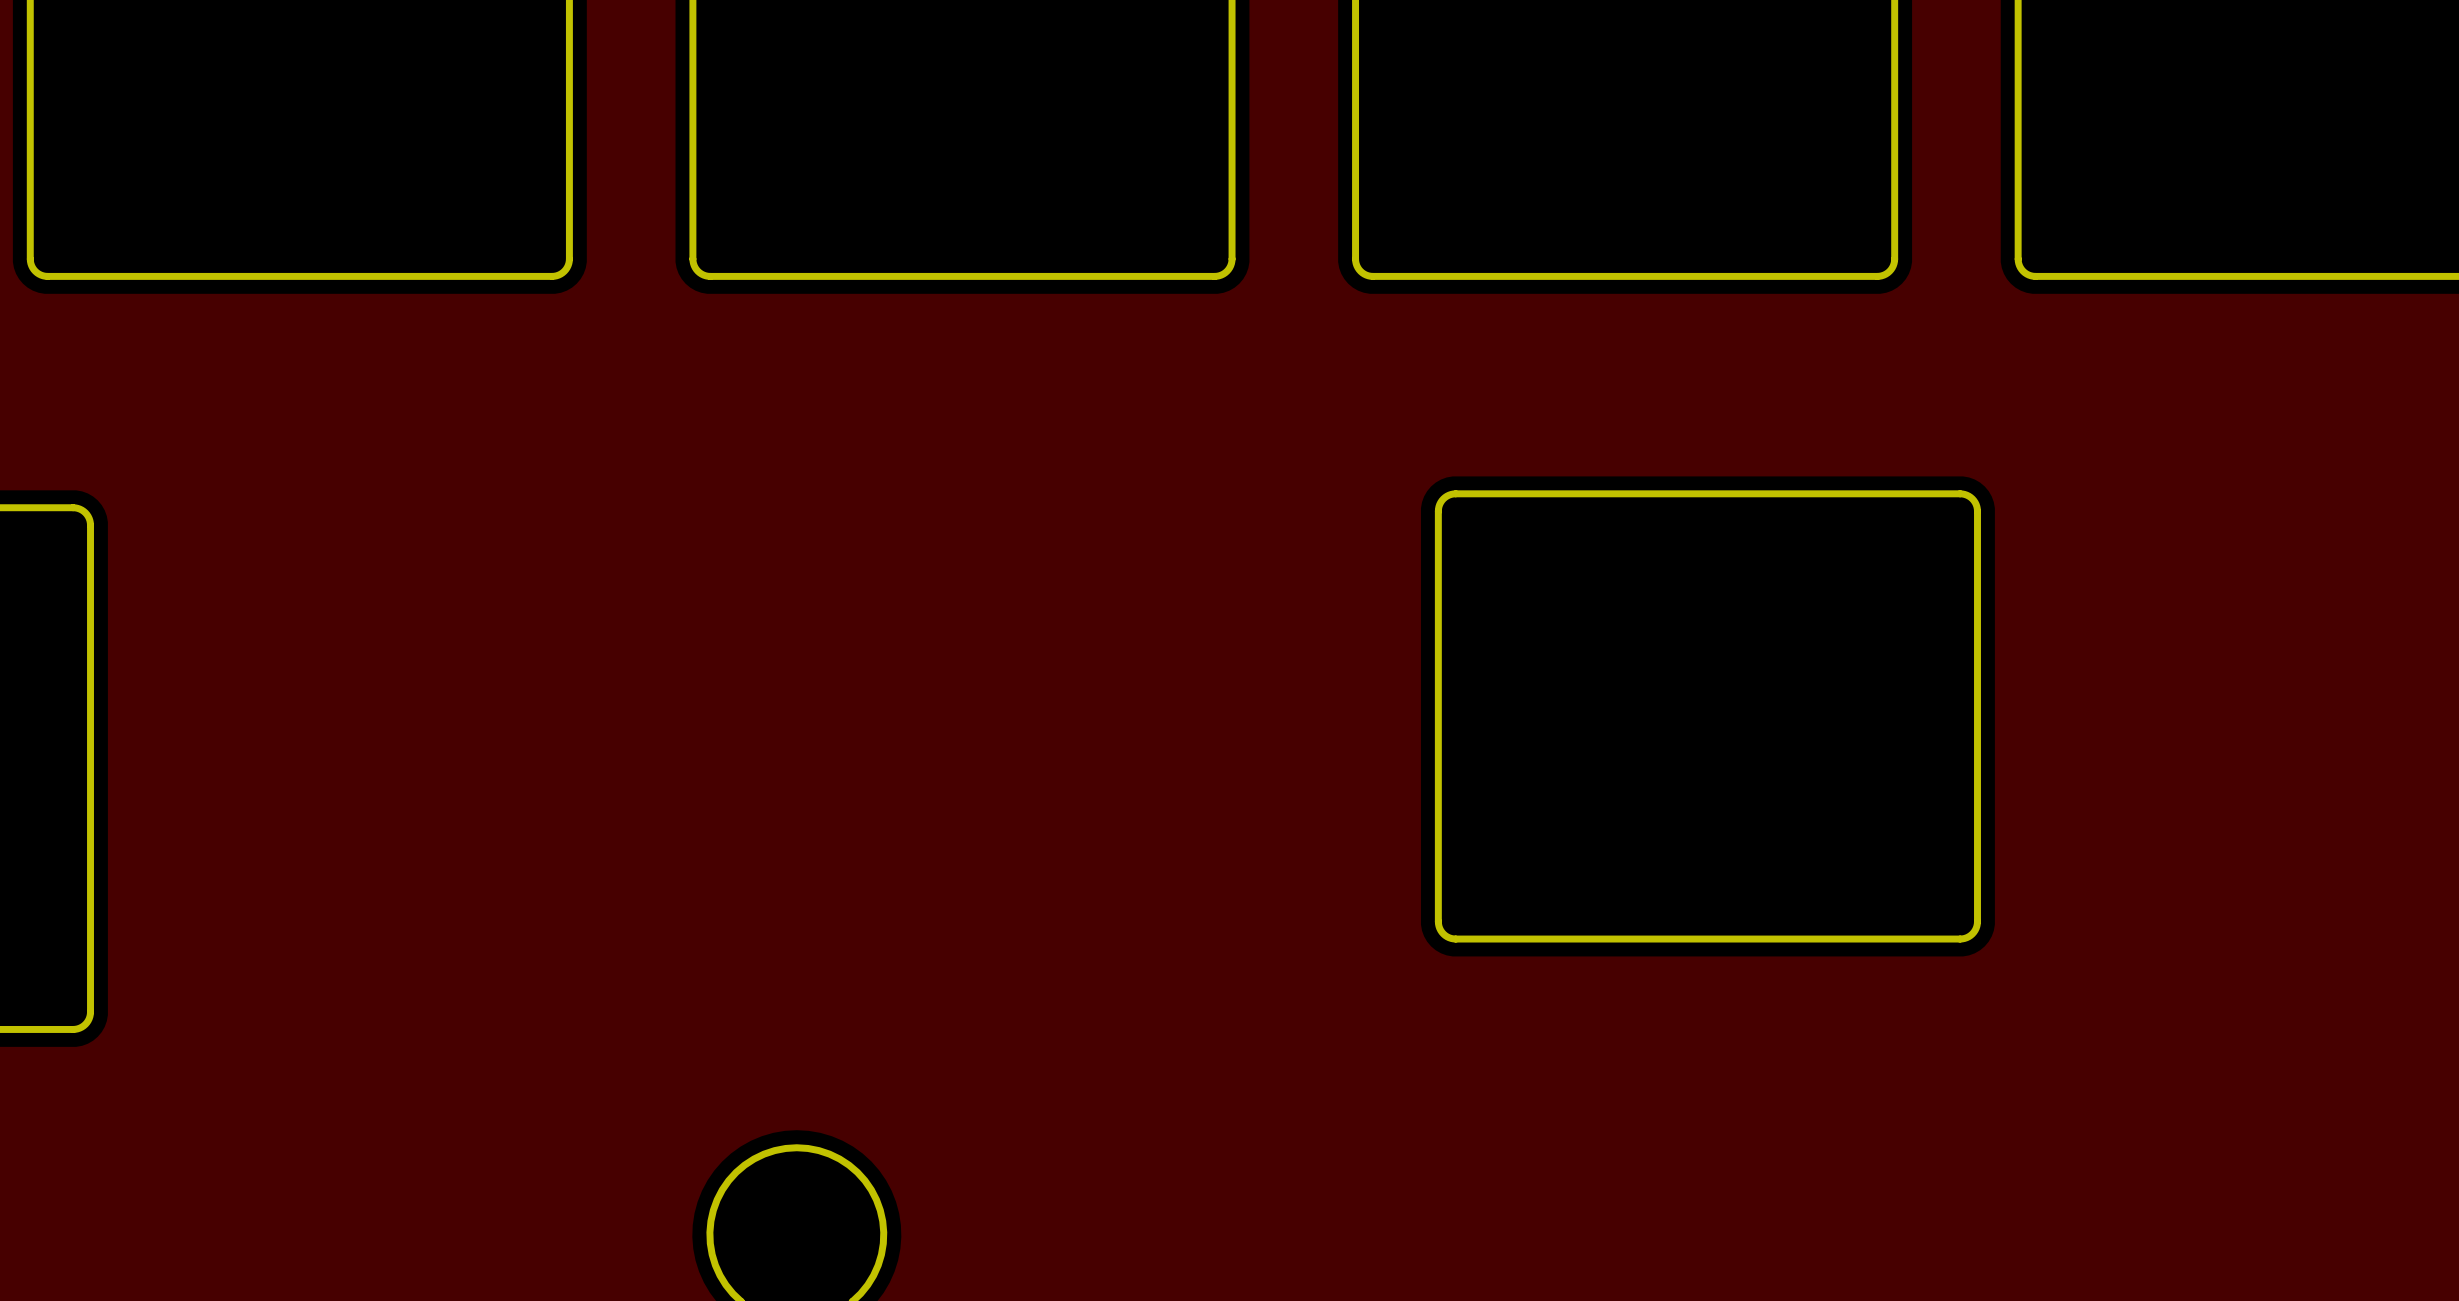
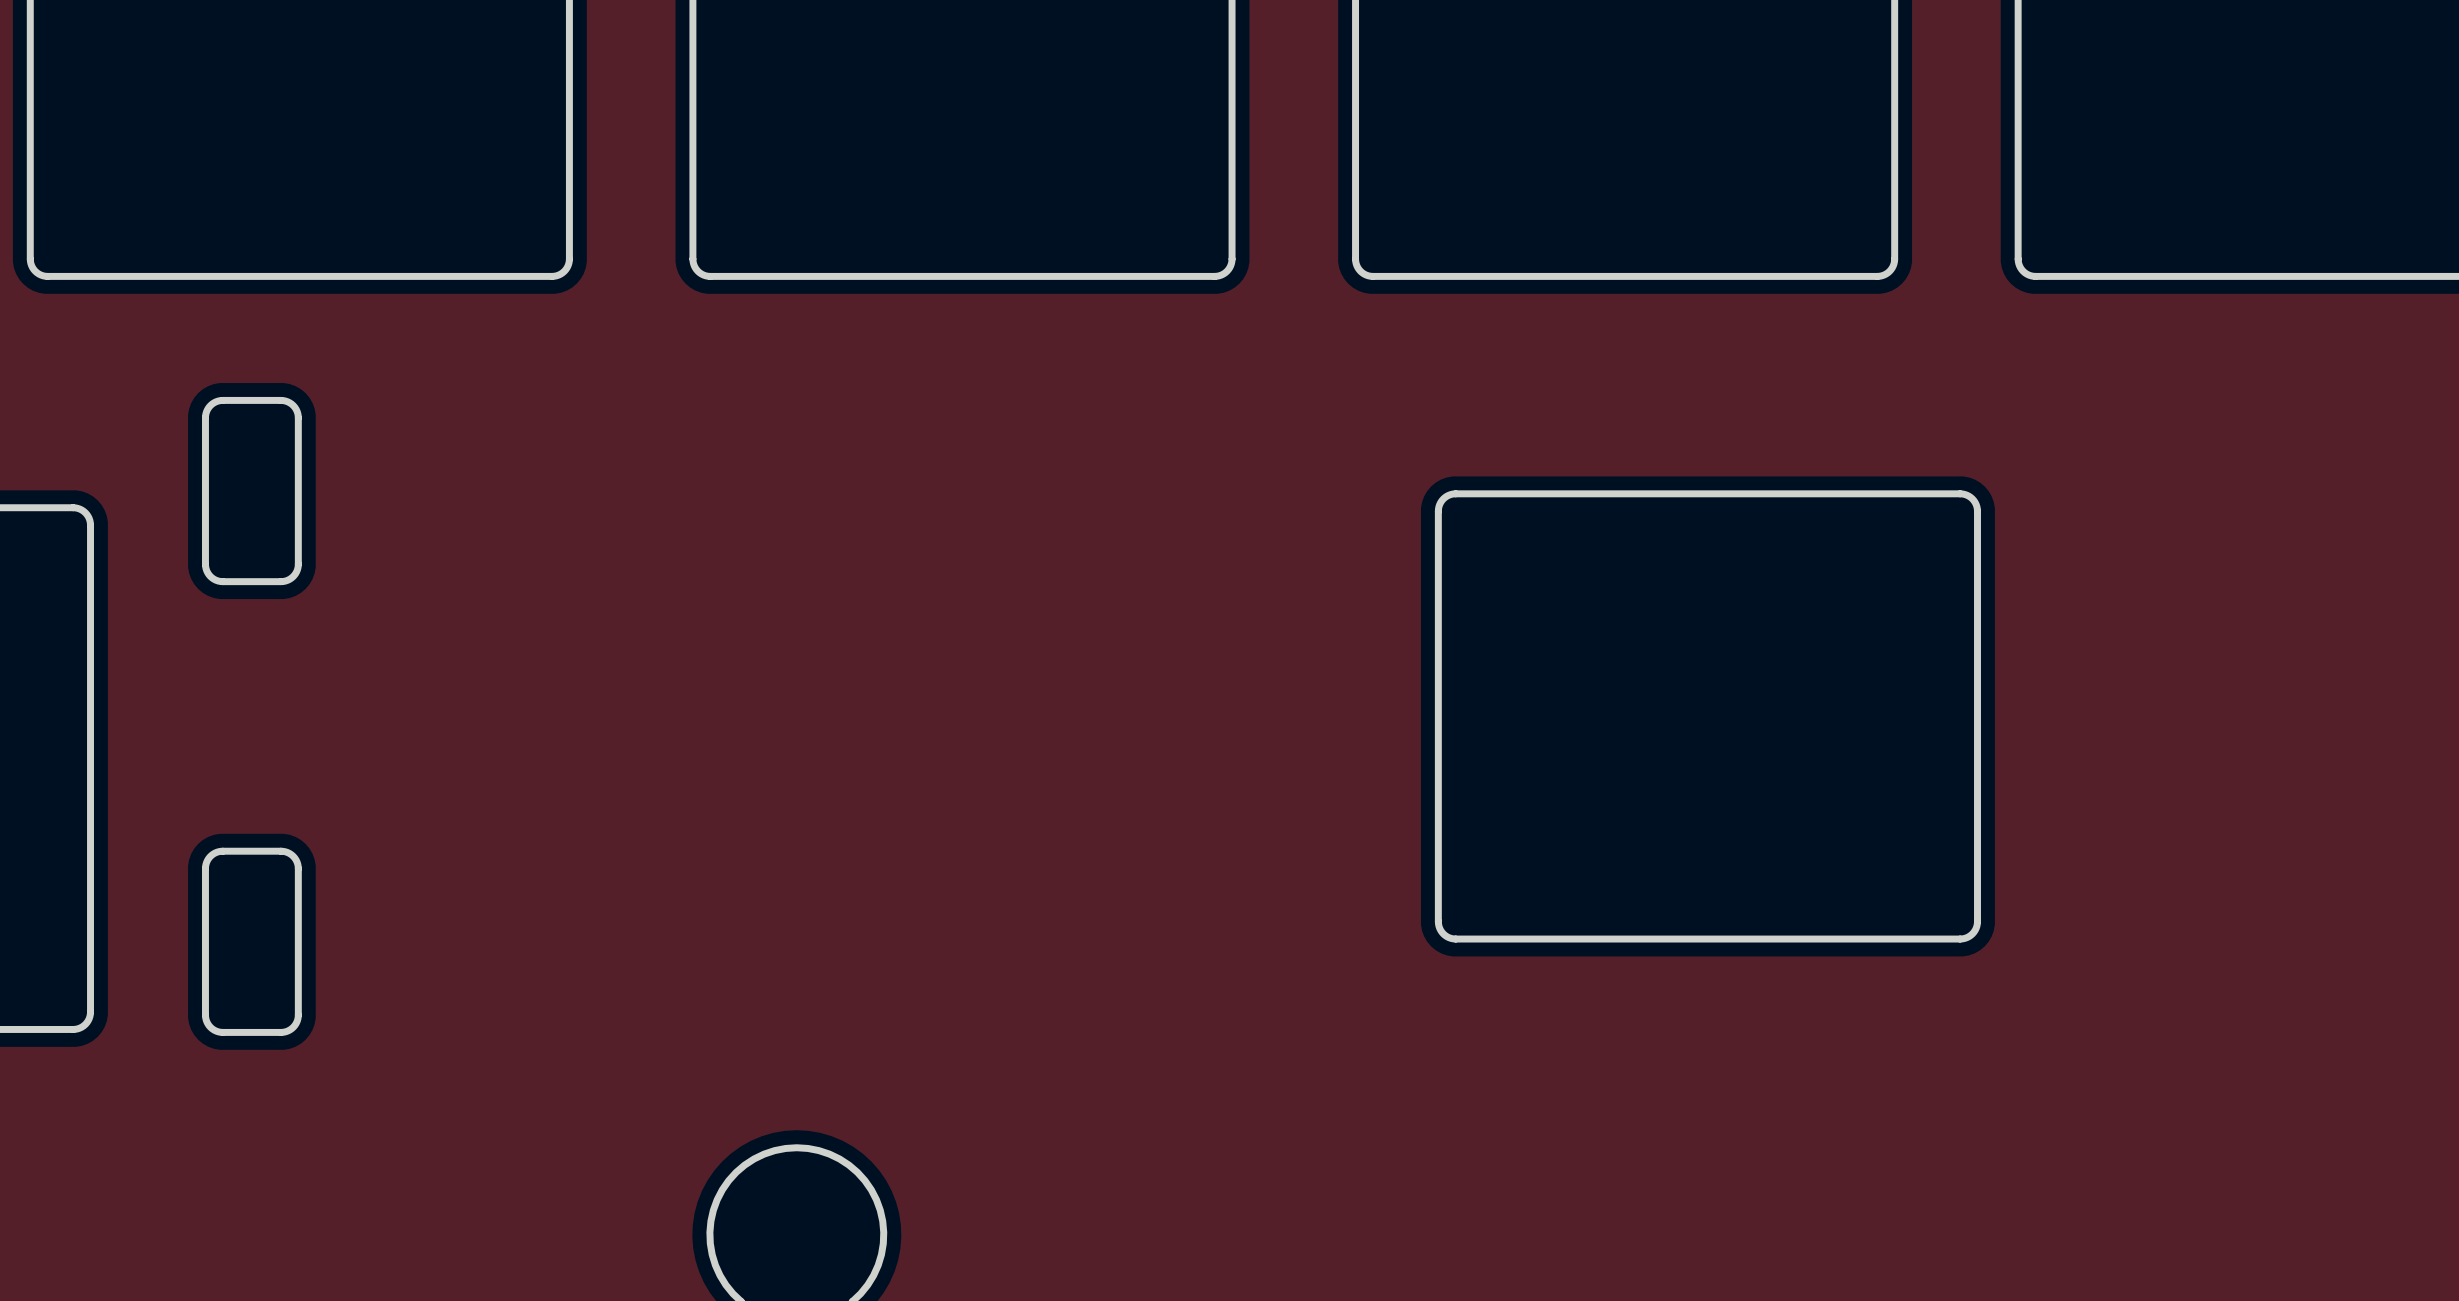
board edge: none -> (222, 400) (283, 400) (291, 404) (297, 411) (298, 566) (294, 575) (286, 580) (220, 581) (212, 578) (206, 570) (205, 415) (210, 405) (222, 400)
board edge: none -> (222, 851) (283, 851) (291, 854) (297, 861) (298, 1016) (294, 1025) (286, 1031) (220, 1032) (212, 1028) (206, 1021) (205, 866) (212, 855) (222, 851)

